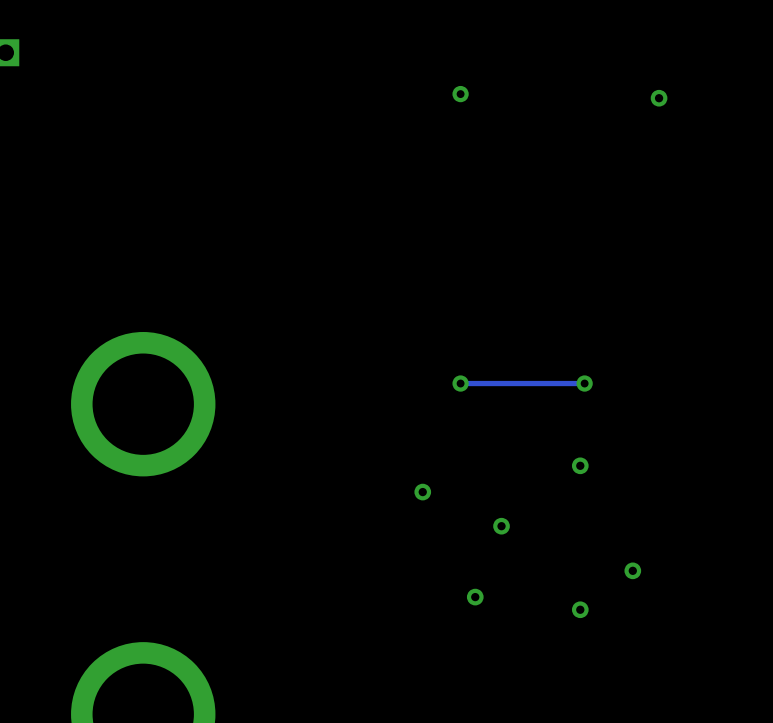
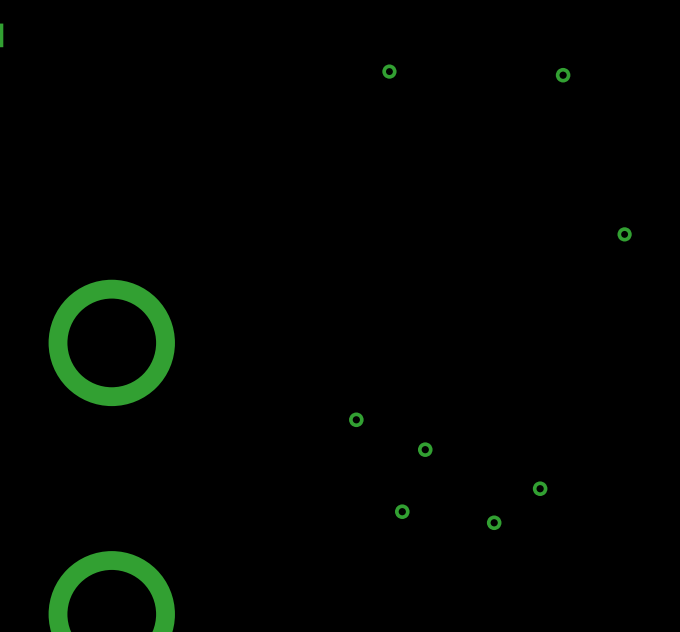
via: none -> (624, 234)
via: (460, 383) -> none
track: (584, 383) (460, 383) -> none
via: (584, 383) -> none
via: (580, 465) -> none

